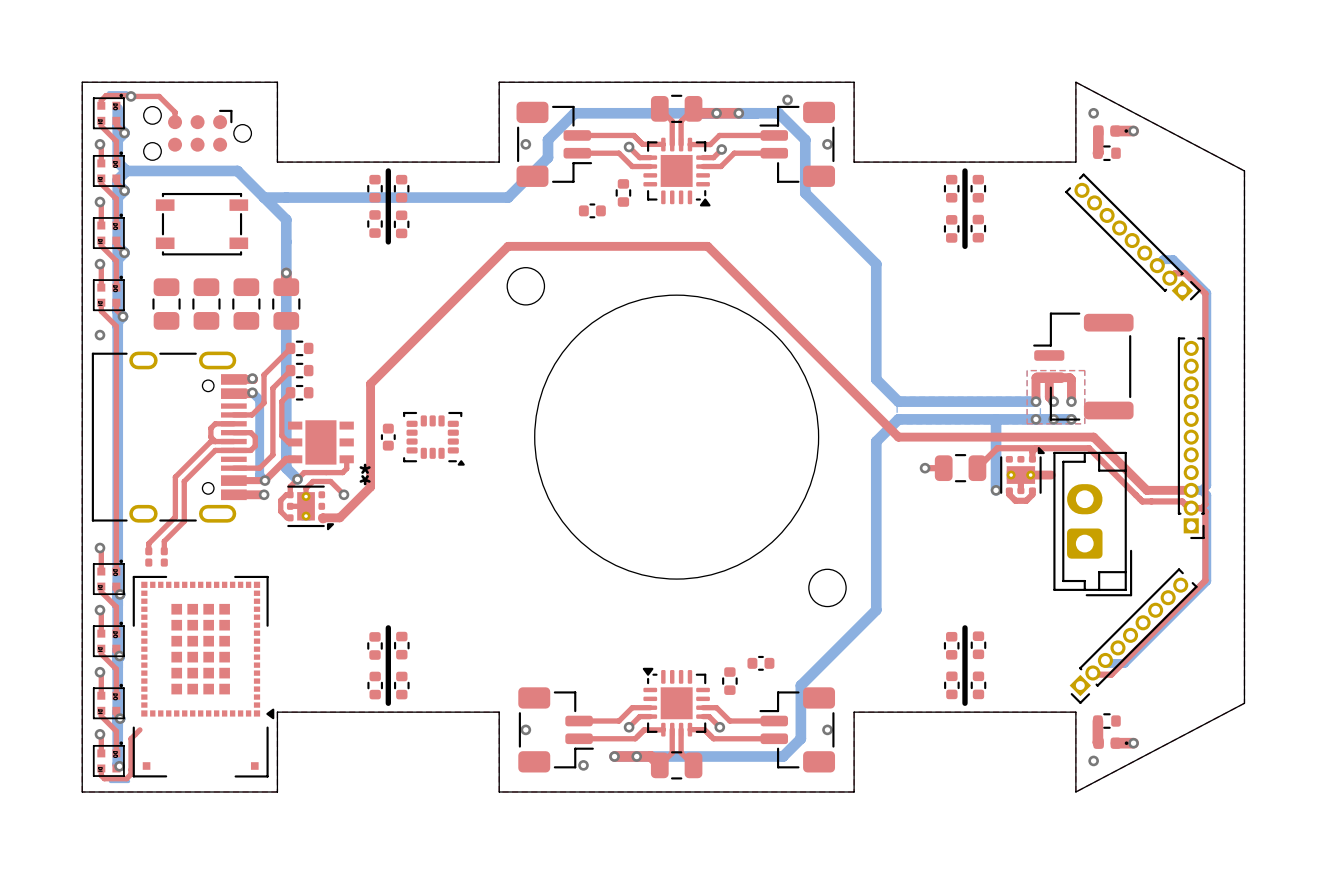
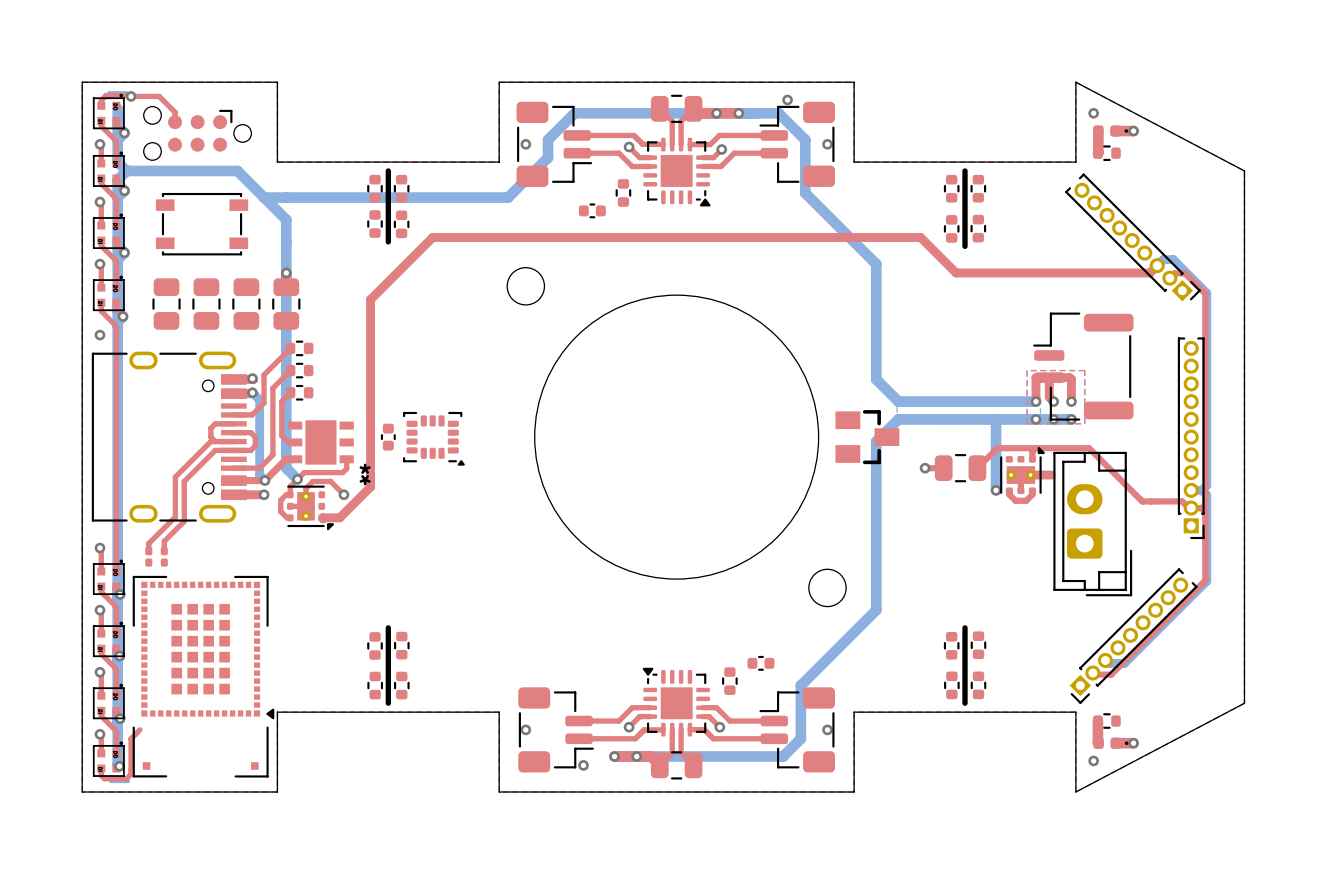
top track: (370, 383) (508, 246) (707, 246) (898, 437) (1093, 437) (1146, 490) (1191, 490) -> (370, 383) (370, 299) (432, 237) (920, 237) (956, 272) (1149, 272) (1157, 265)
part: none -> (867, 437)

